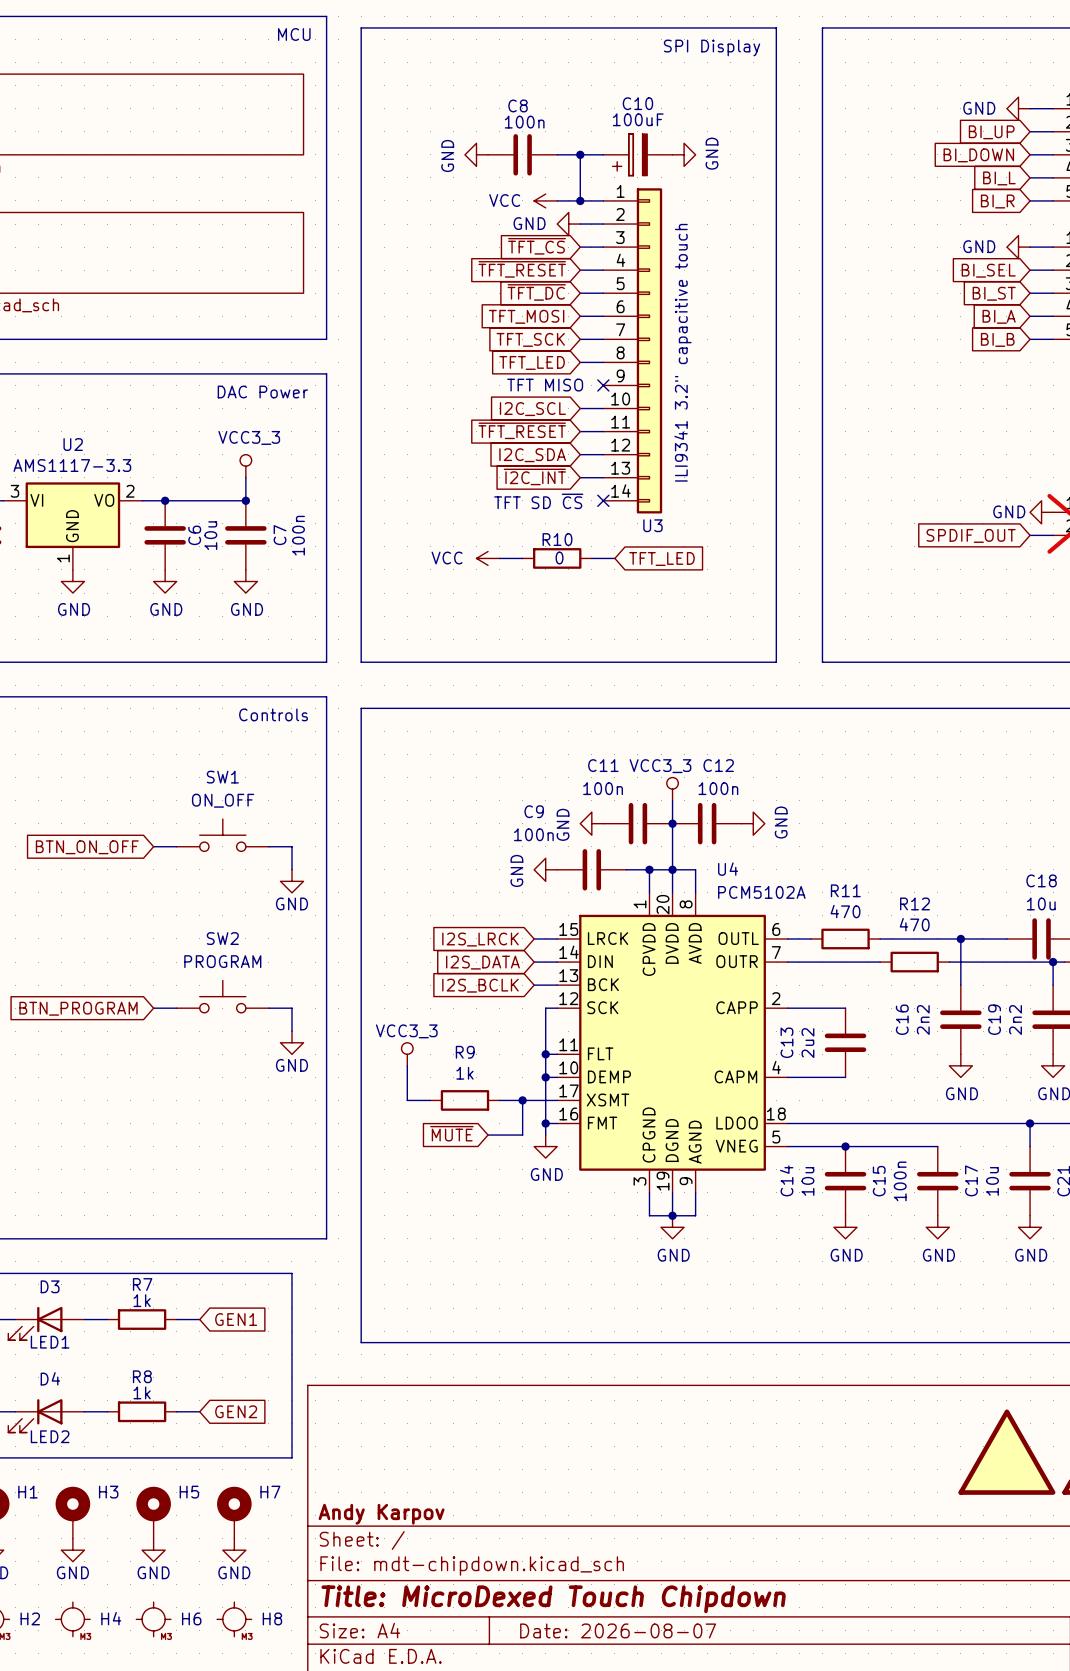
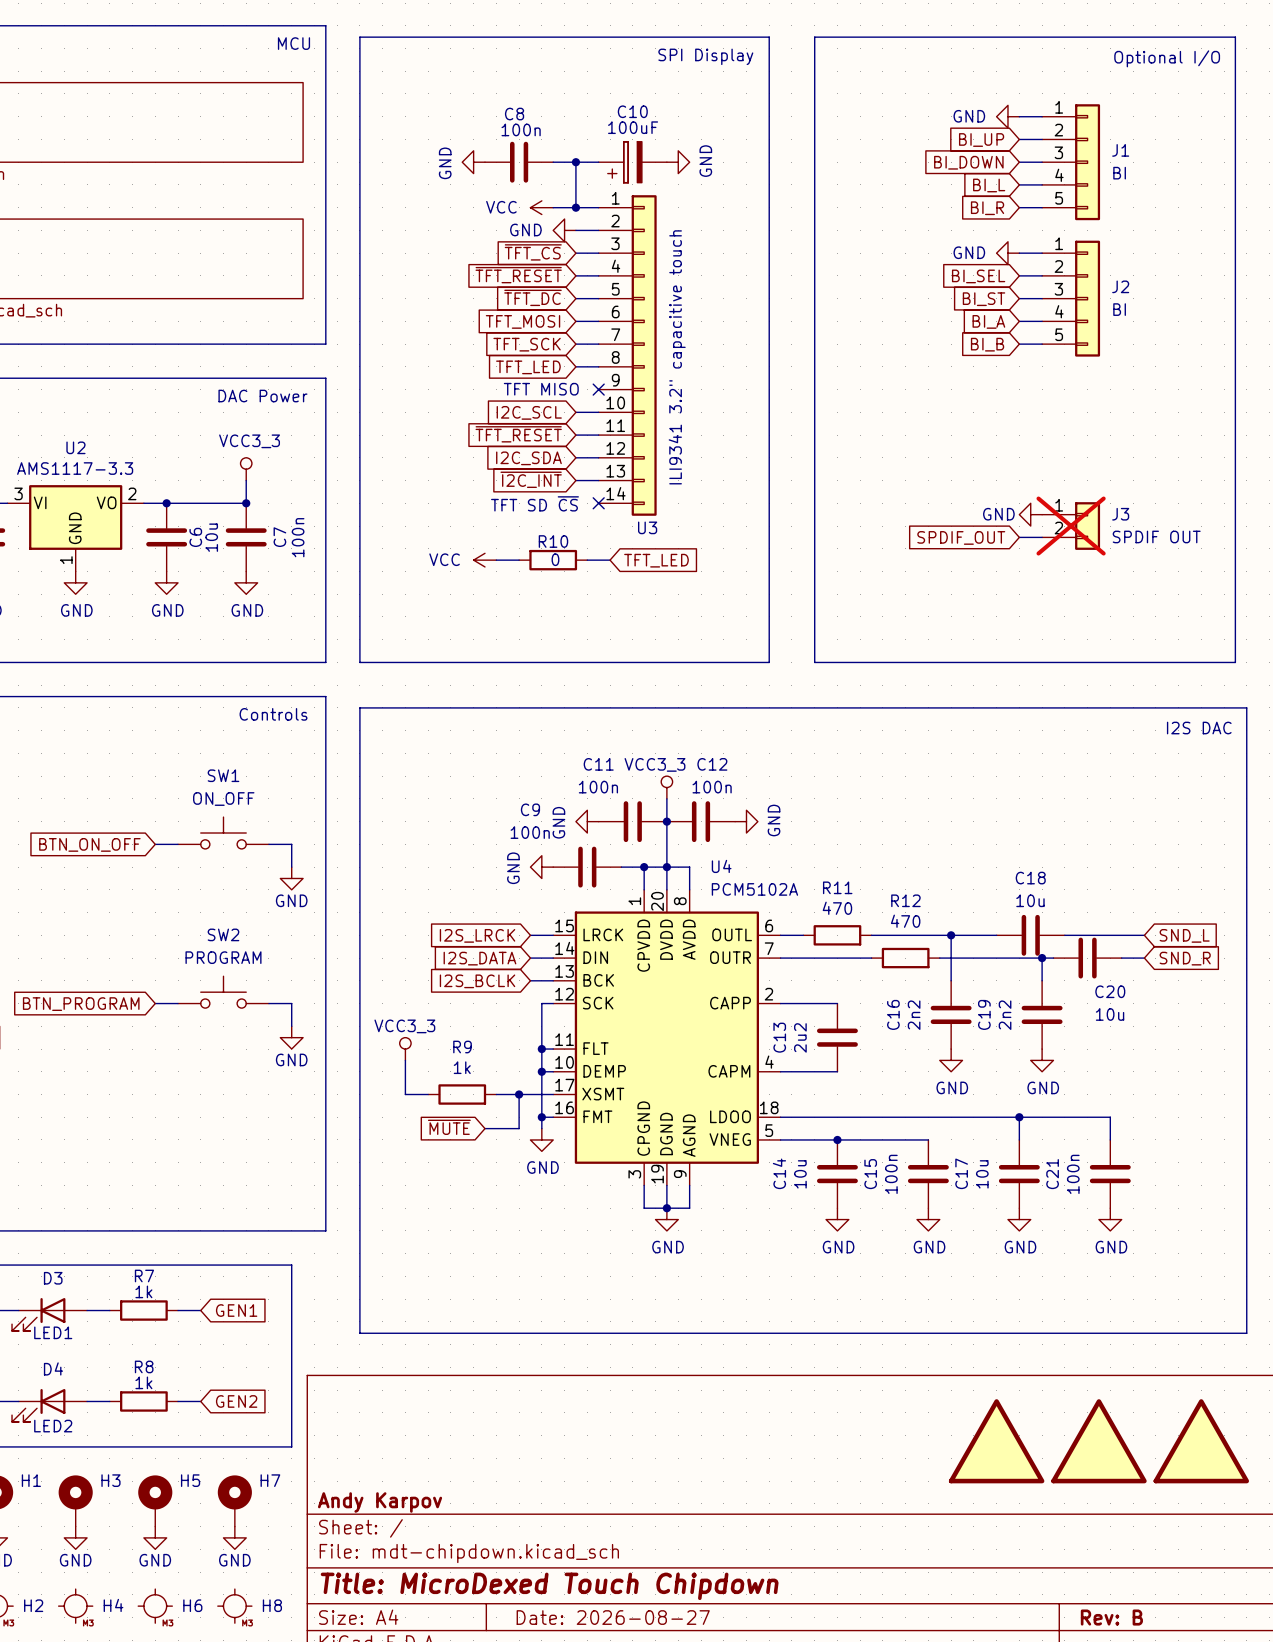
title block: Date: 2026-08-07 (618, 1630) -> Date: 2026-08-27 (613, 1617)

